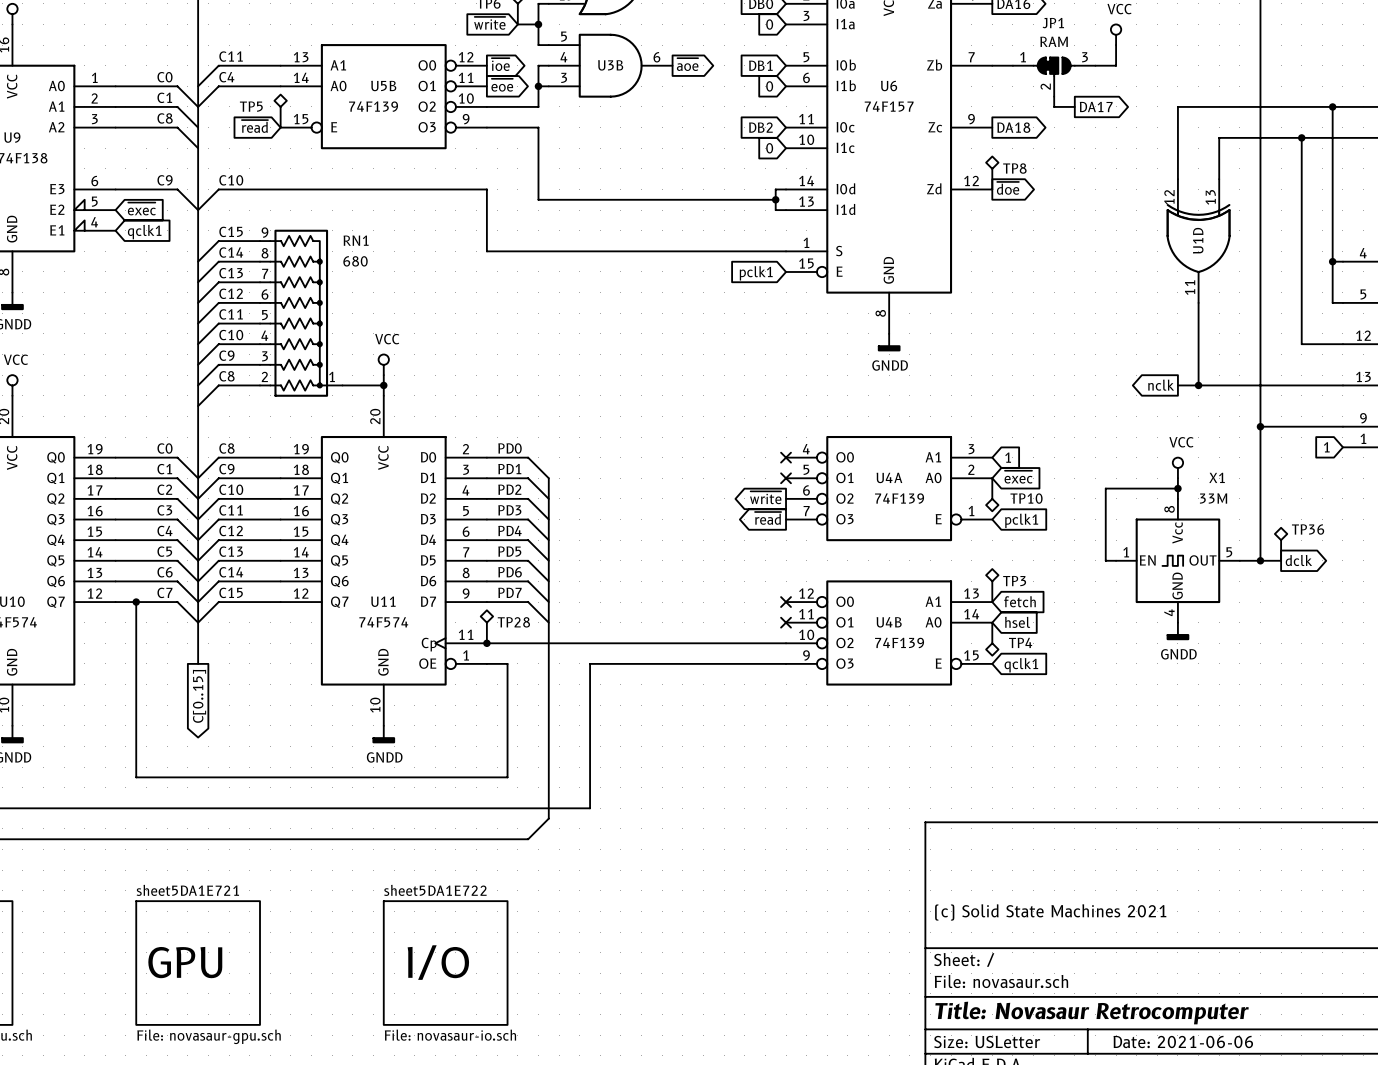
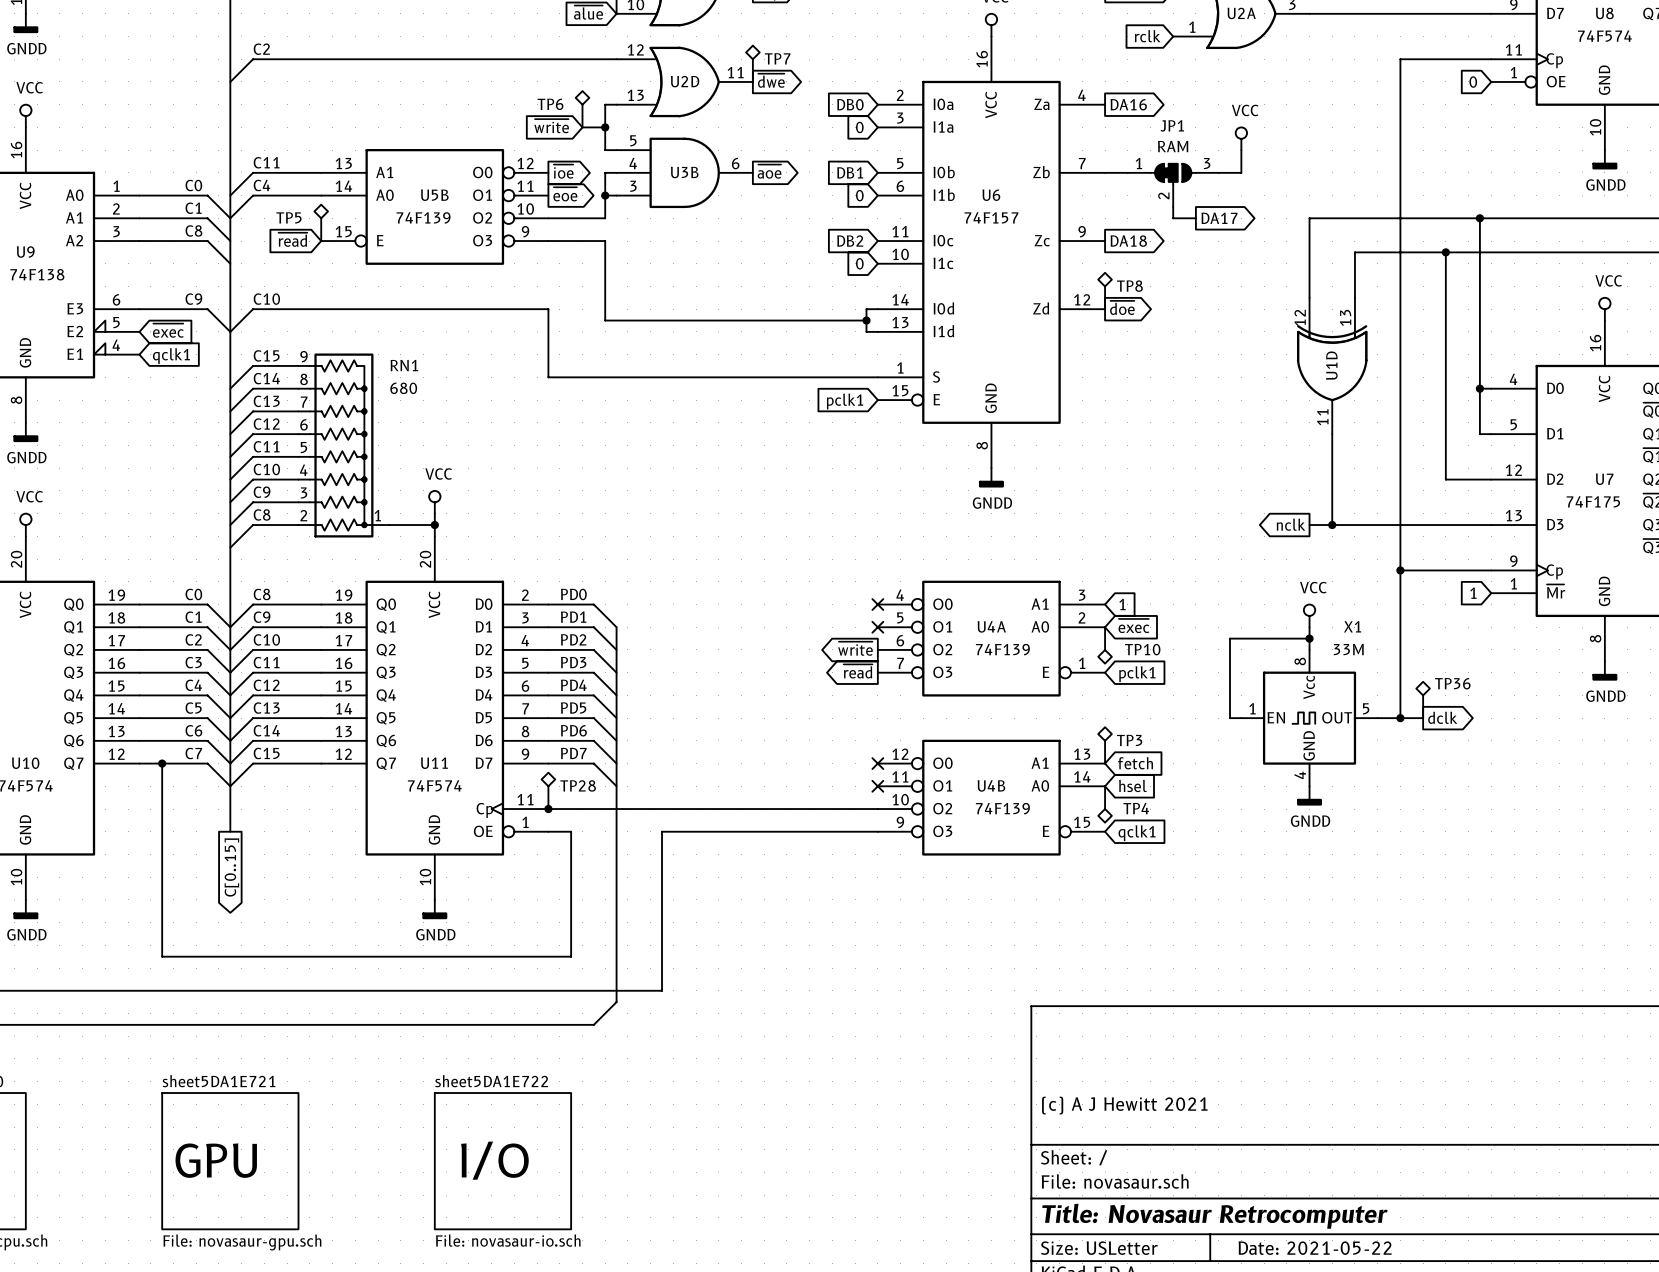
title block: (c) Solid State Machines 2021 (1050, 912) -> (c) A J Hewitt 2021 (1124, 1105)
title block: Date: 2021-06-06 (1183, 1041) -> Date: 2021-05-22 (1315, 1248)

